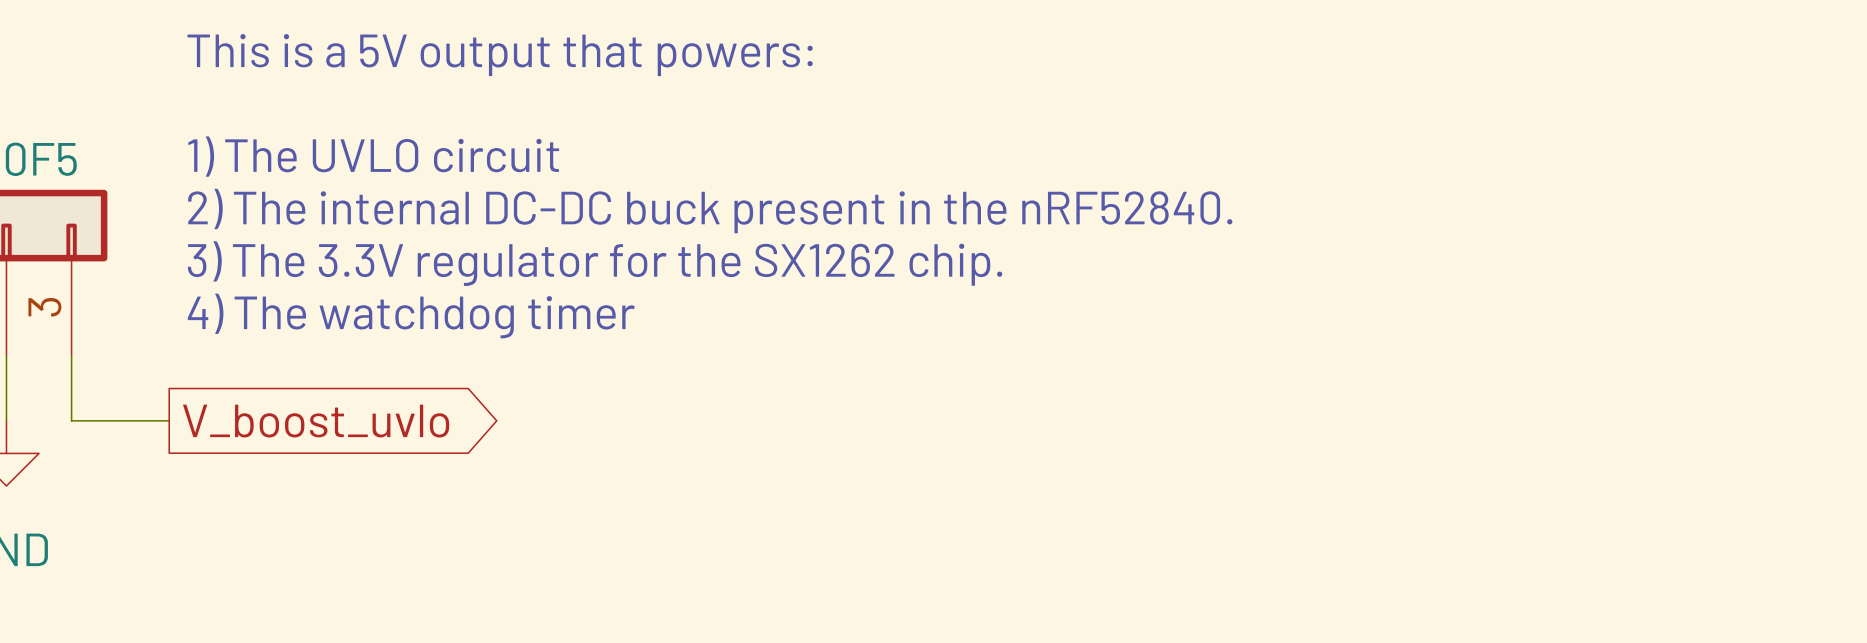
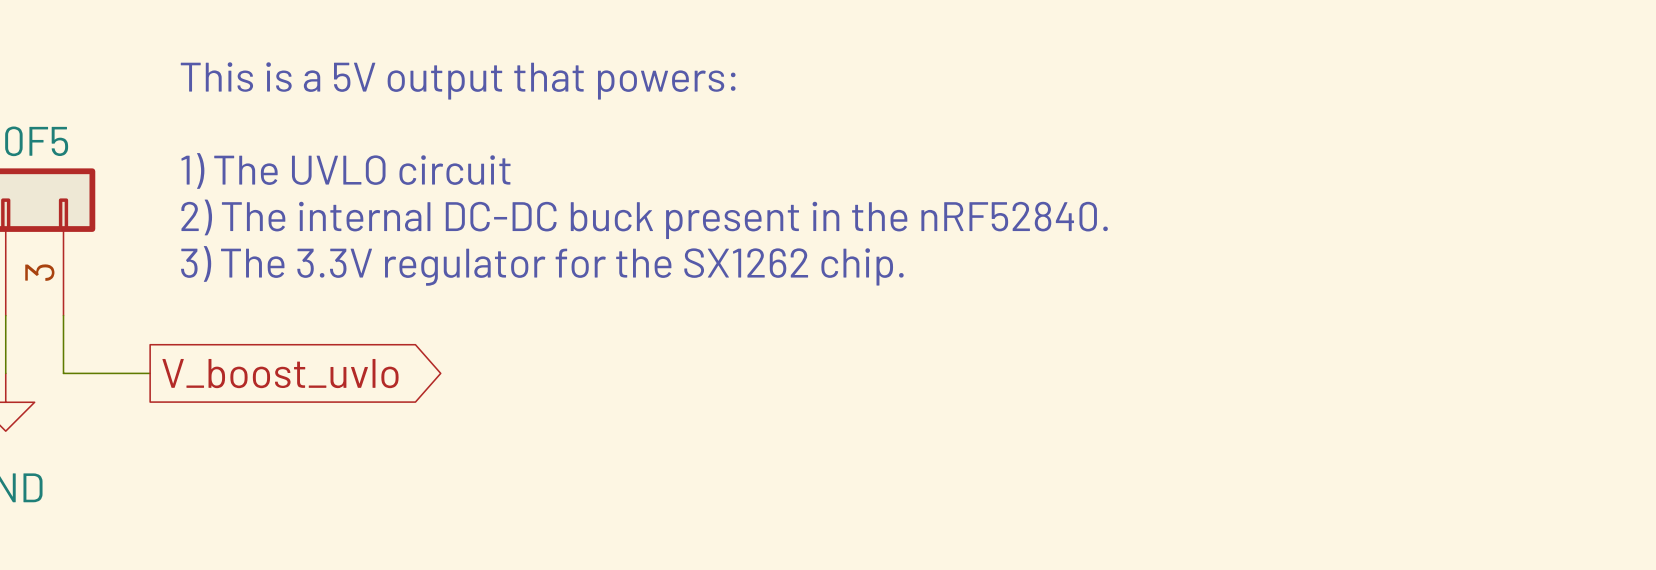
text position: This is a 5V output that powers: (500, 55) -> This is a 5V output that powers: (458, 80)
text position: 1) The UVLO circuit (373, 156) -> 1) The UVLO circuit (345, 170)
text position: 2) The internal DC-DC buck present in the nRF52840. (710, 211) -> 2) The internal DC-DC buck present in the nRF52840. (644, 219)
text position: 3) The 3.3V regulator for the SX1262 chip. (595, 263) -> 3) The 3.3V regulator for the SX1262 chip. (542, 265)
text: 4) The watchdog timer (411, 315) -> none

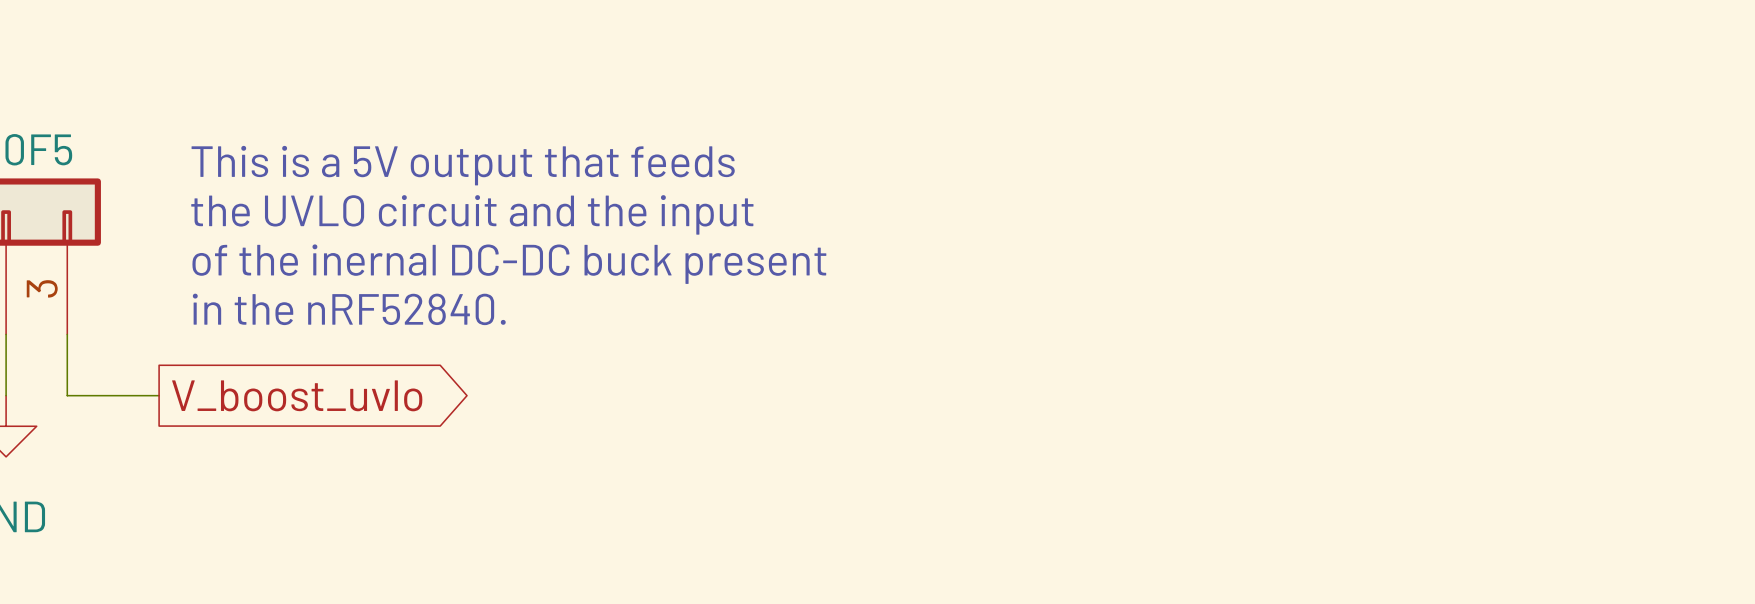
text: This is a 5V output that powers: (458, 80) -> none
text: none -> This is a 5V output that feeds (463, 165)
text: 1) The UVLO circuit (345, 170) -> the UVLO circuit and the input (472, 214)
text: 2) The internal DC-DC buck present in the nRF52840. (644, 219) -> of the inernal DC-DC buck present (509, 264)
text: 3) The 3.3V regulator for the SX1262 chip. (542, 265) -> none
text: none -> in the nRF52840. (349, 309)

